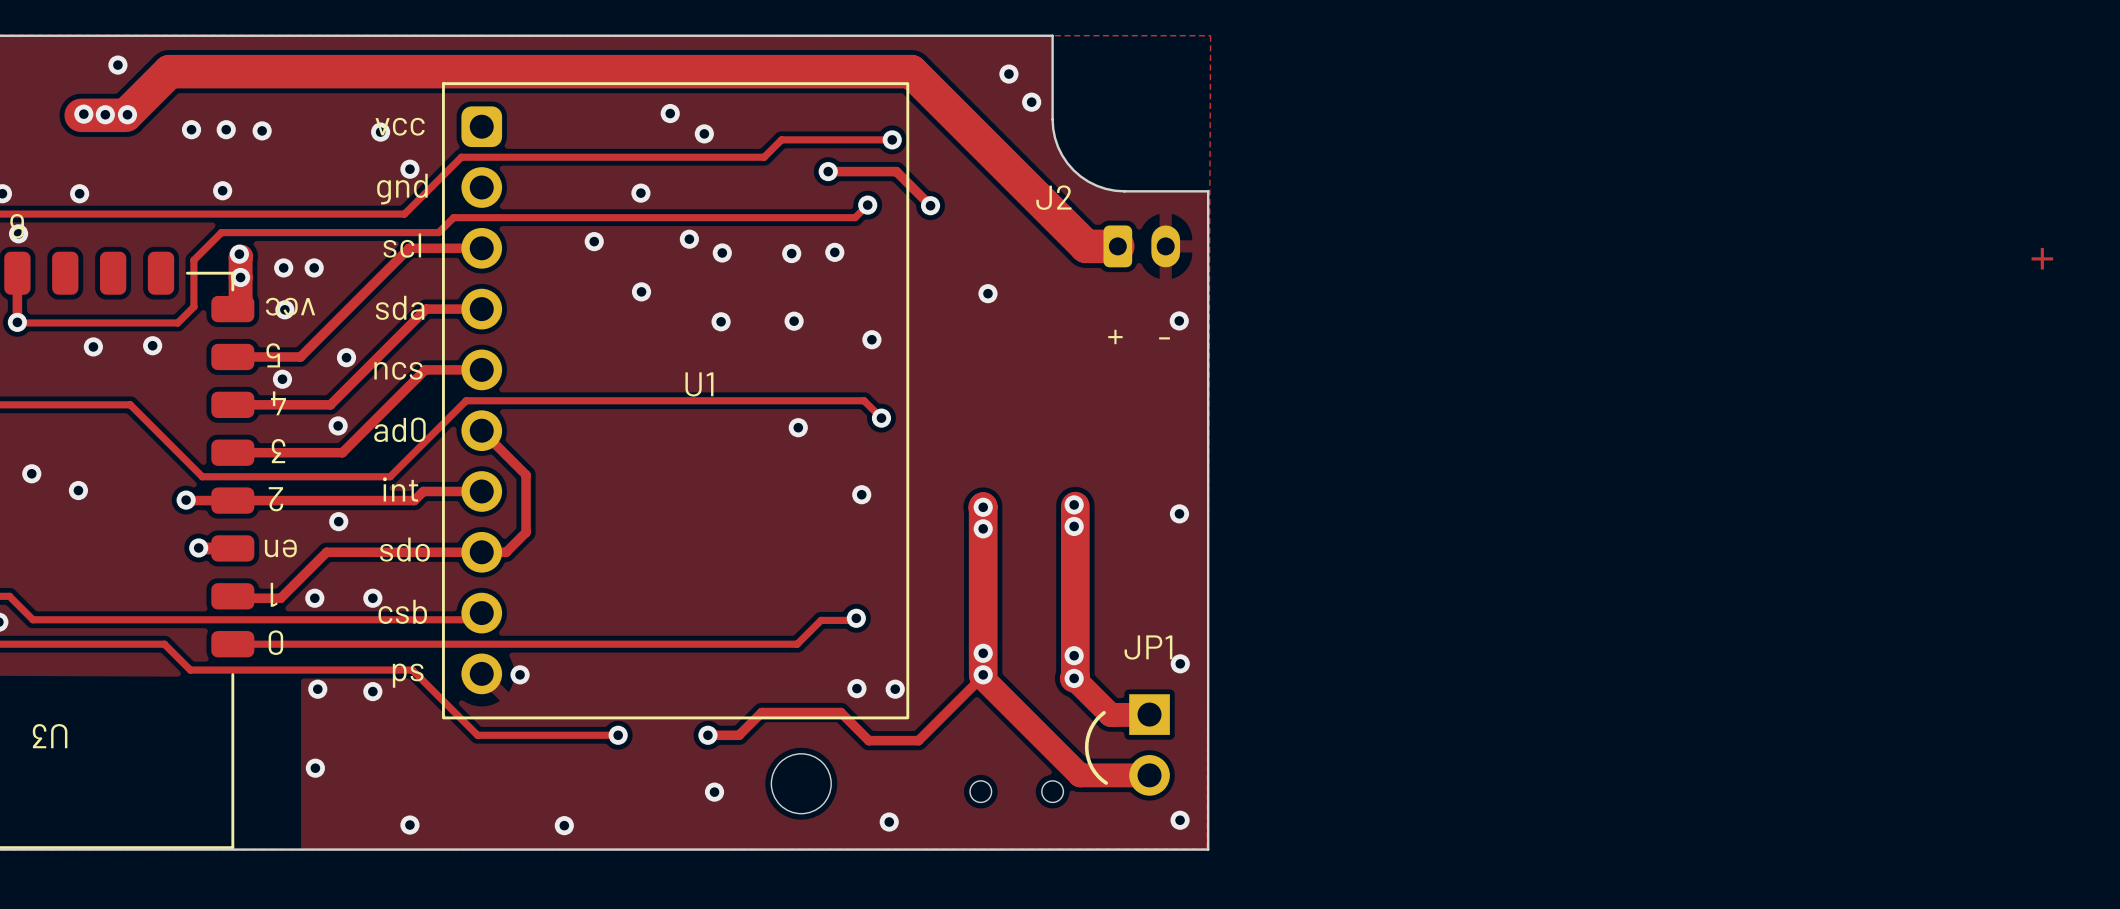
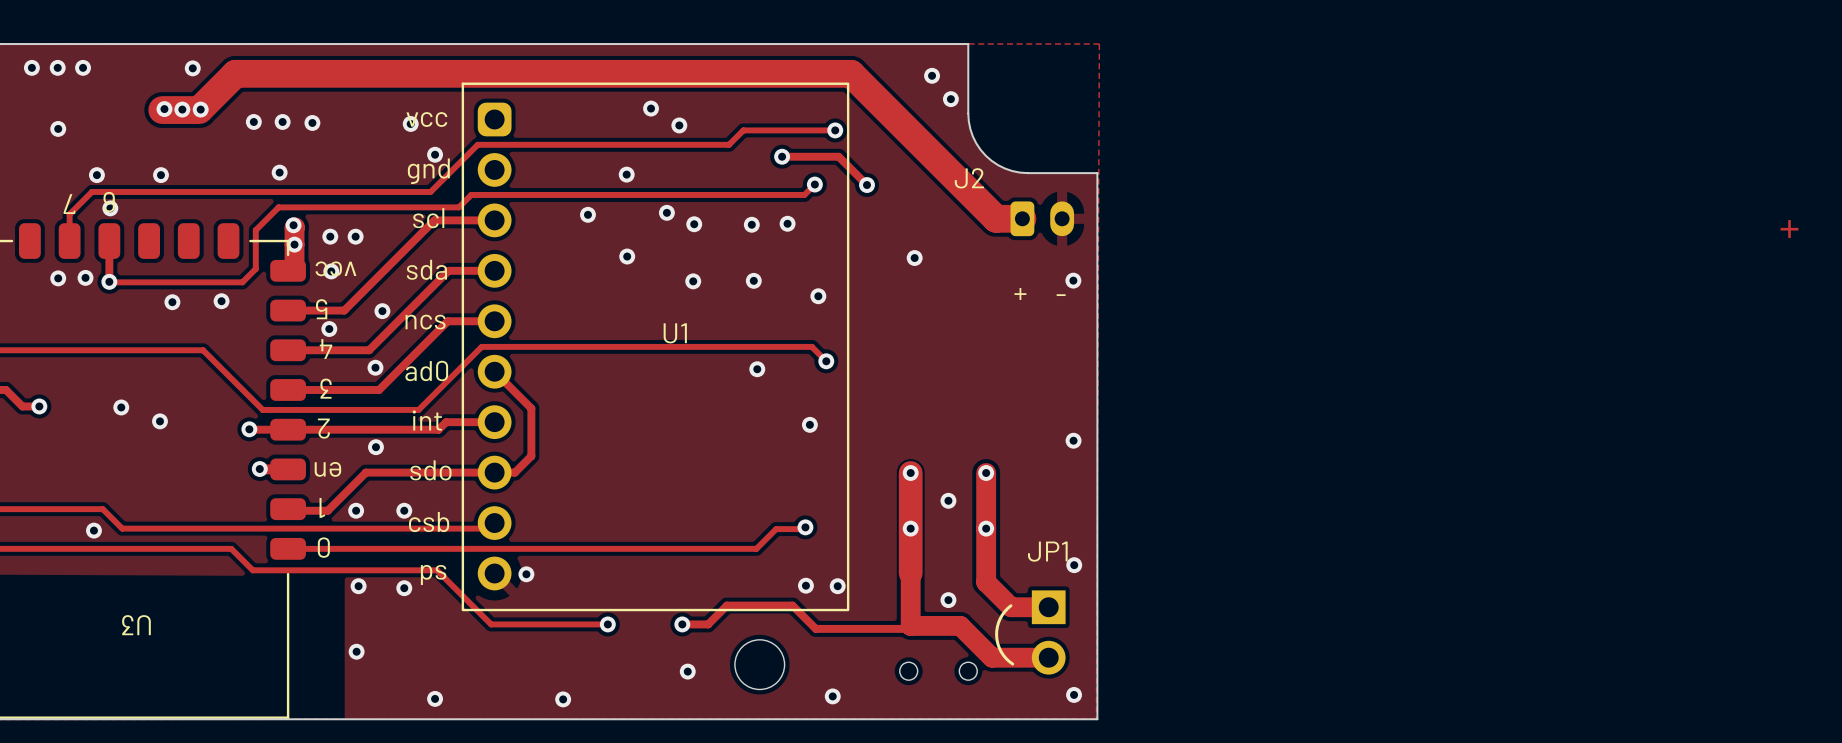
via: (1074, 504) -> none
track: (1075, 506) (1074, 678) (1110, 714) (1149, 714) -> (986, 473) (986, 582) (1011, 607) (1048, 607)
track: (982, 507) (983, 552) -> none
via: (983, 507) -> none
via: (1074, 526) -> none
via: (983, 528) -> none
via: none -> (910, 473)
via: none -> (986, 473)
via: none -> (948, 500)
via: none -> (910, 528)
via: none -> (986, 528)
via: (983, 653) -> none
via: (1074, 655) -> none
track: none -> (910, 573) (910, 625)
via: (983, 674) -> none
track: (980, 676) (1081, 775) -> (910, 625) (960, 625) (992, 657)
track: (981, 677) (918, 740) -> (910, 625) (907, 628) (857, 628)
via: (1074, 678) -> none
via: none -> (948, 600)

